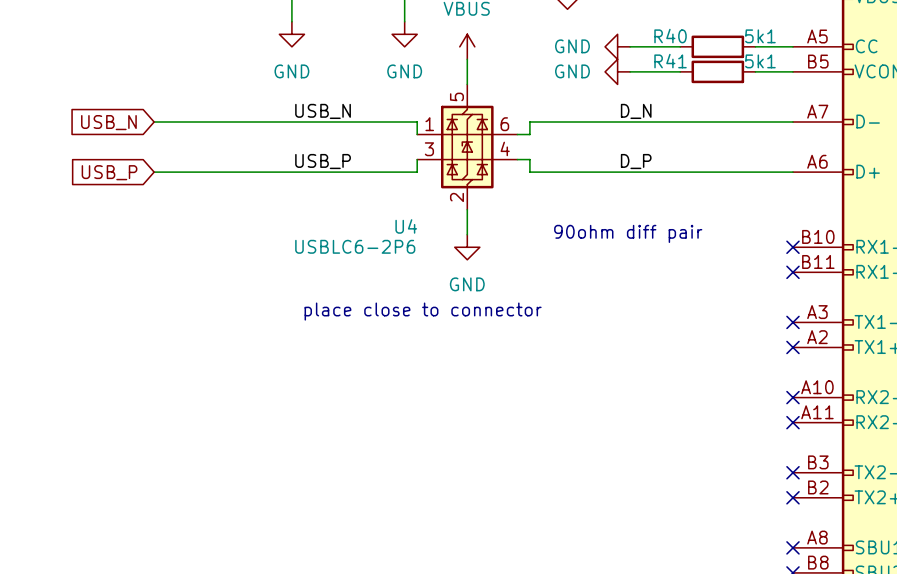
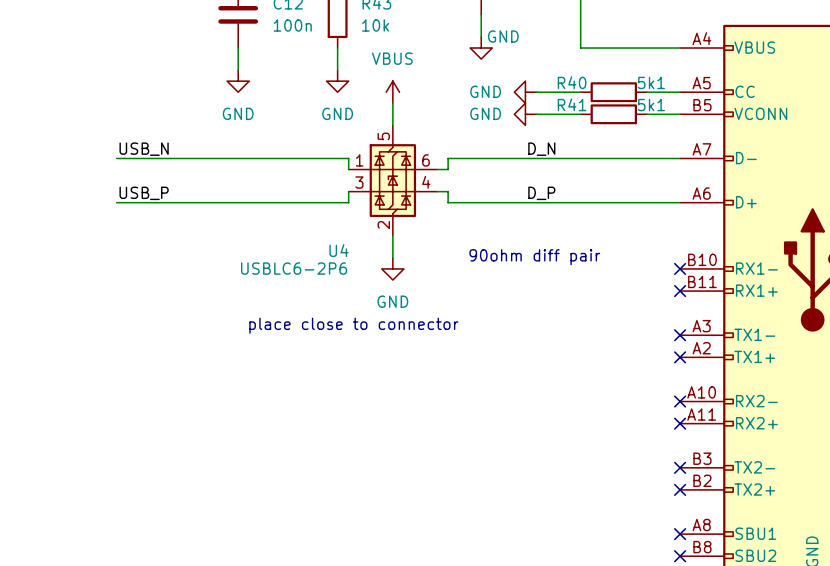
label position: USB_N (323, 111) -> USB_N (144, 149)
global label: USB_N (108, 122) -> none
label position: USB_P (323, 161) -> USB_P (144, 193)
global label: USB_P (109, 172) -> none

